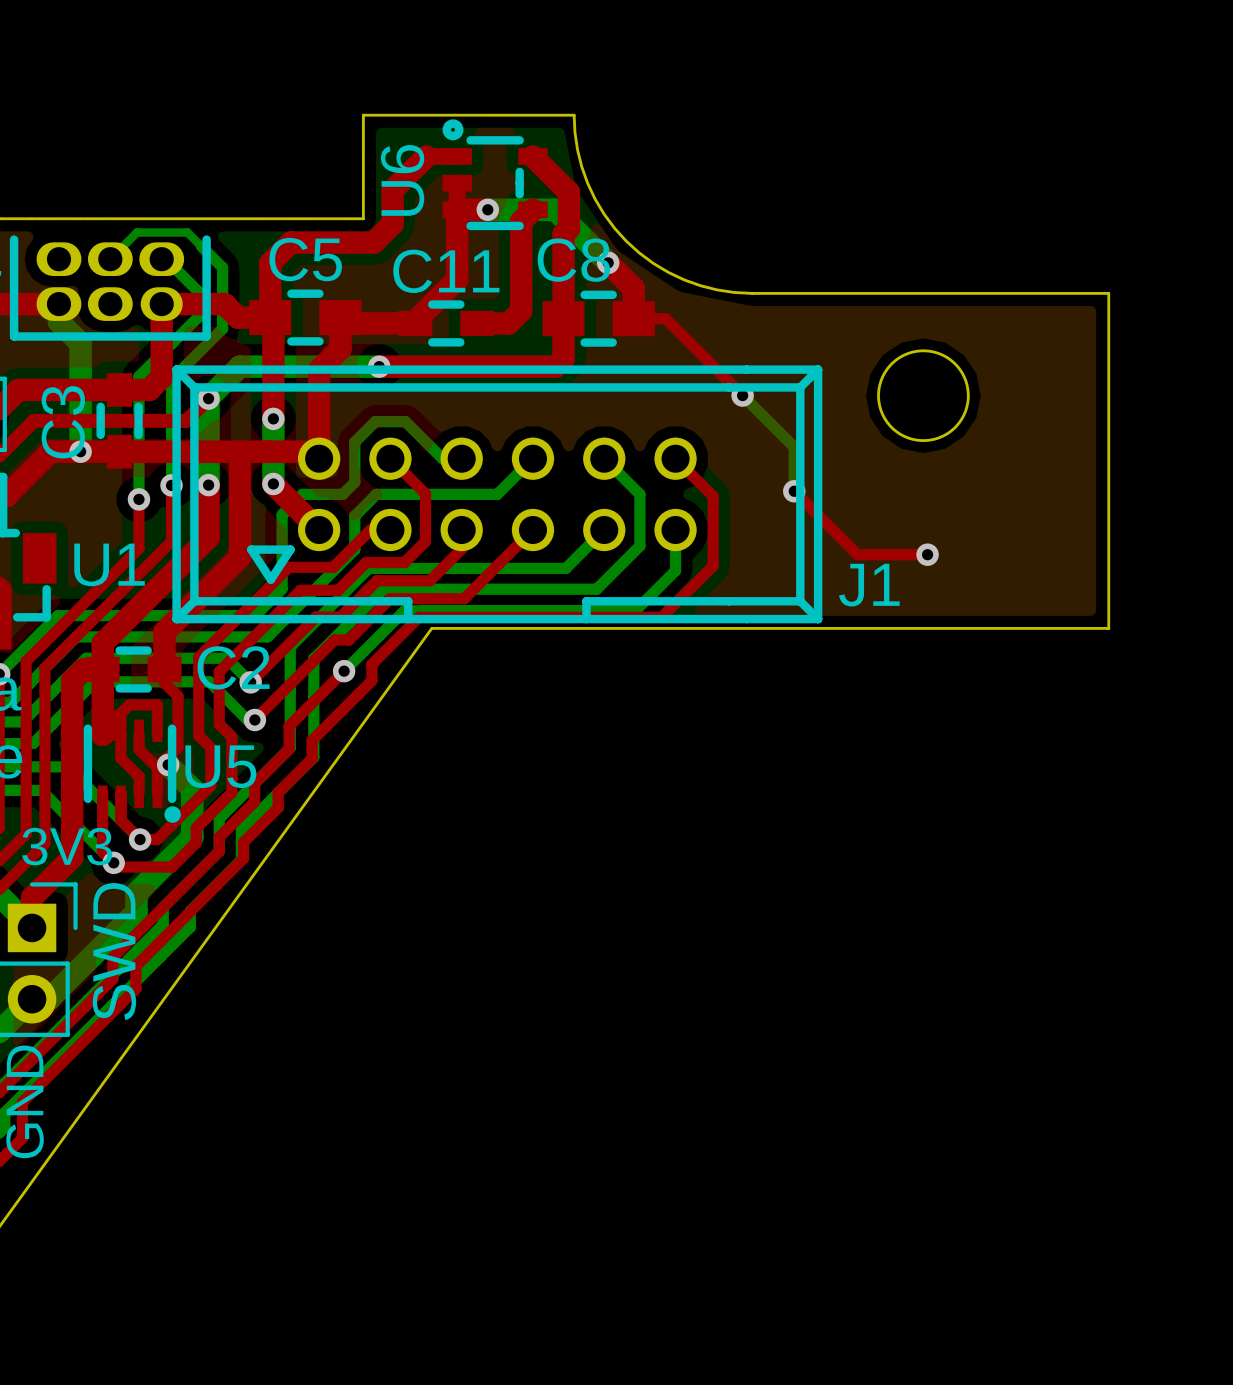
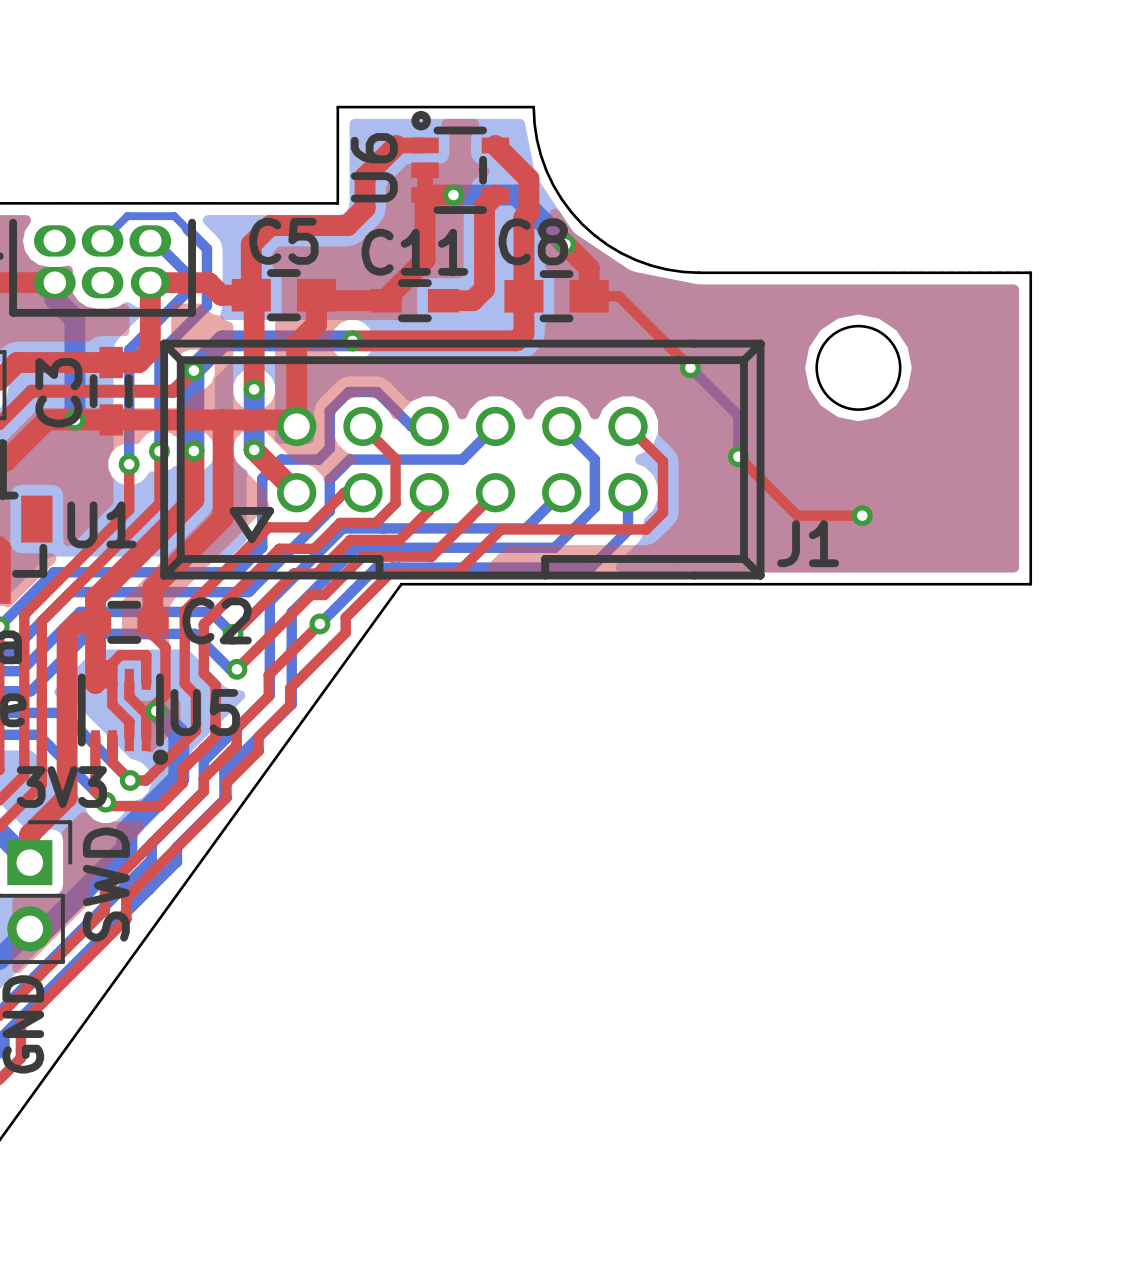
top track: (713, 551) (713, 565) (661, 617) (491, 617) -> (662, 512) (646, 529) (501, 529) (456, 573)

